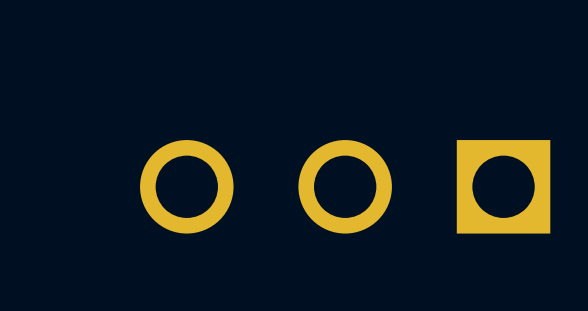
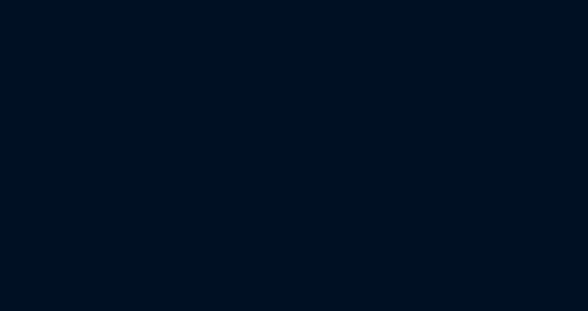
part: (345, 186) -> none

